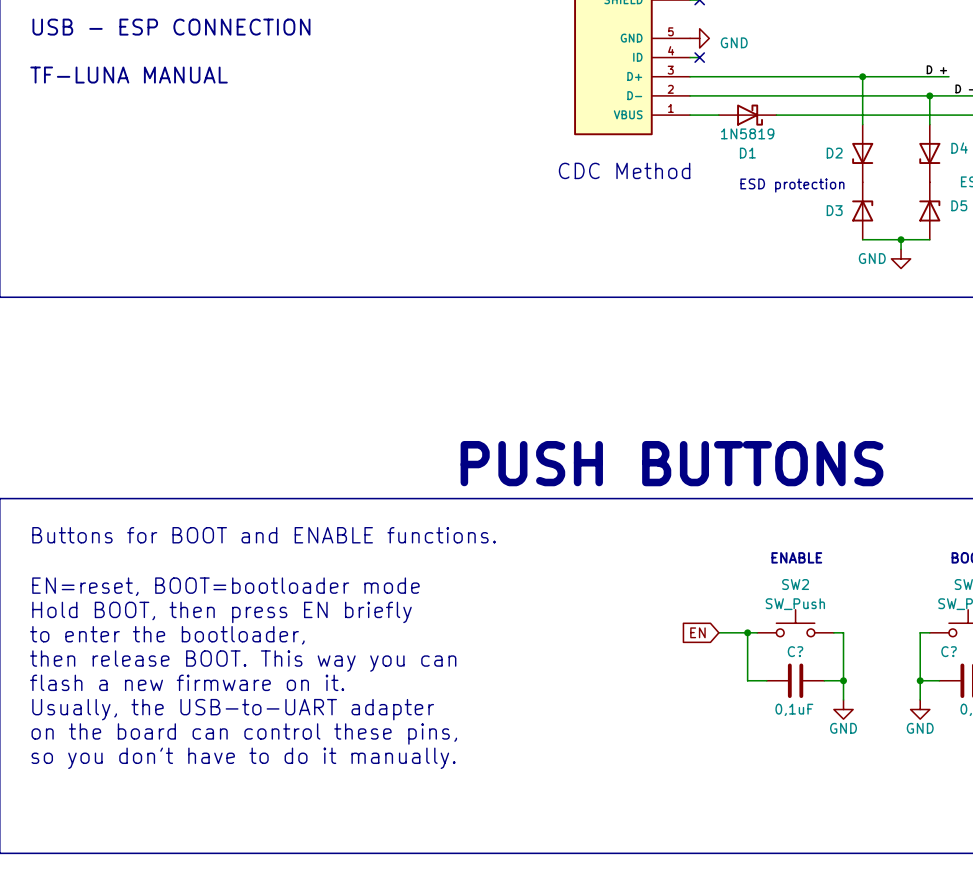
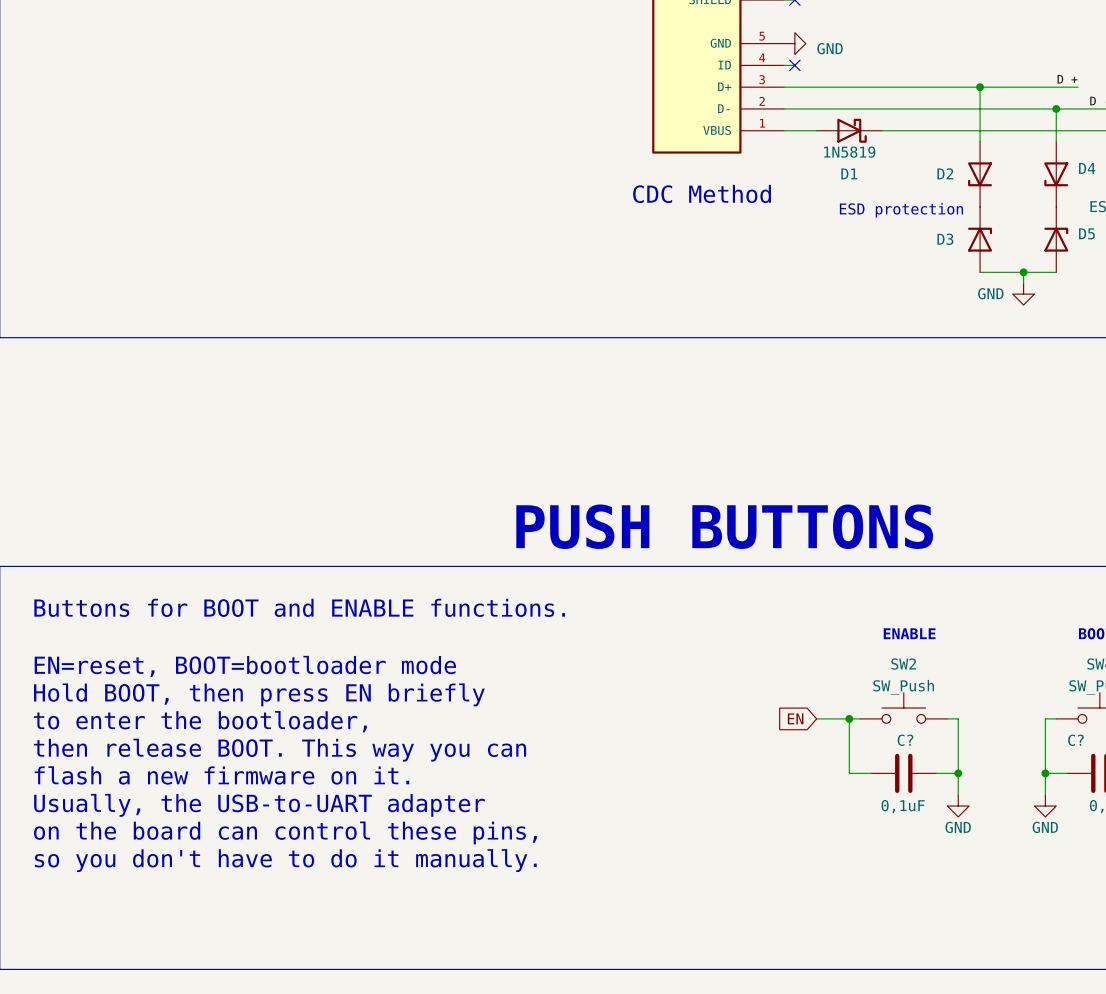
text: USB - ESP CONNECTION (171, 27) -> none
text: TF-LUNA MANUAL (129, 75) -> none

